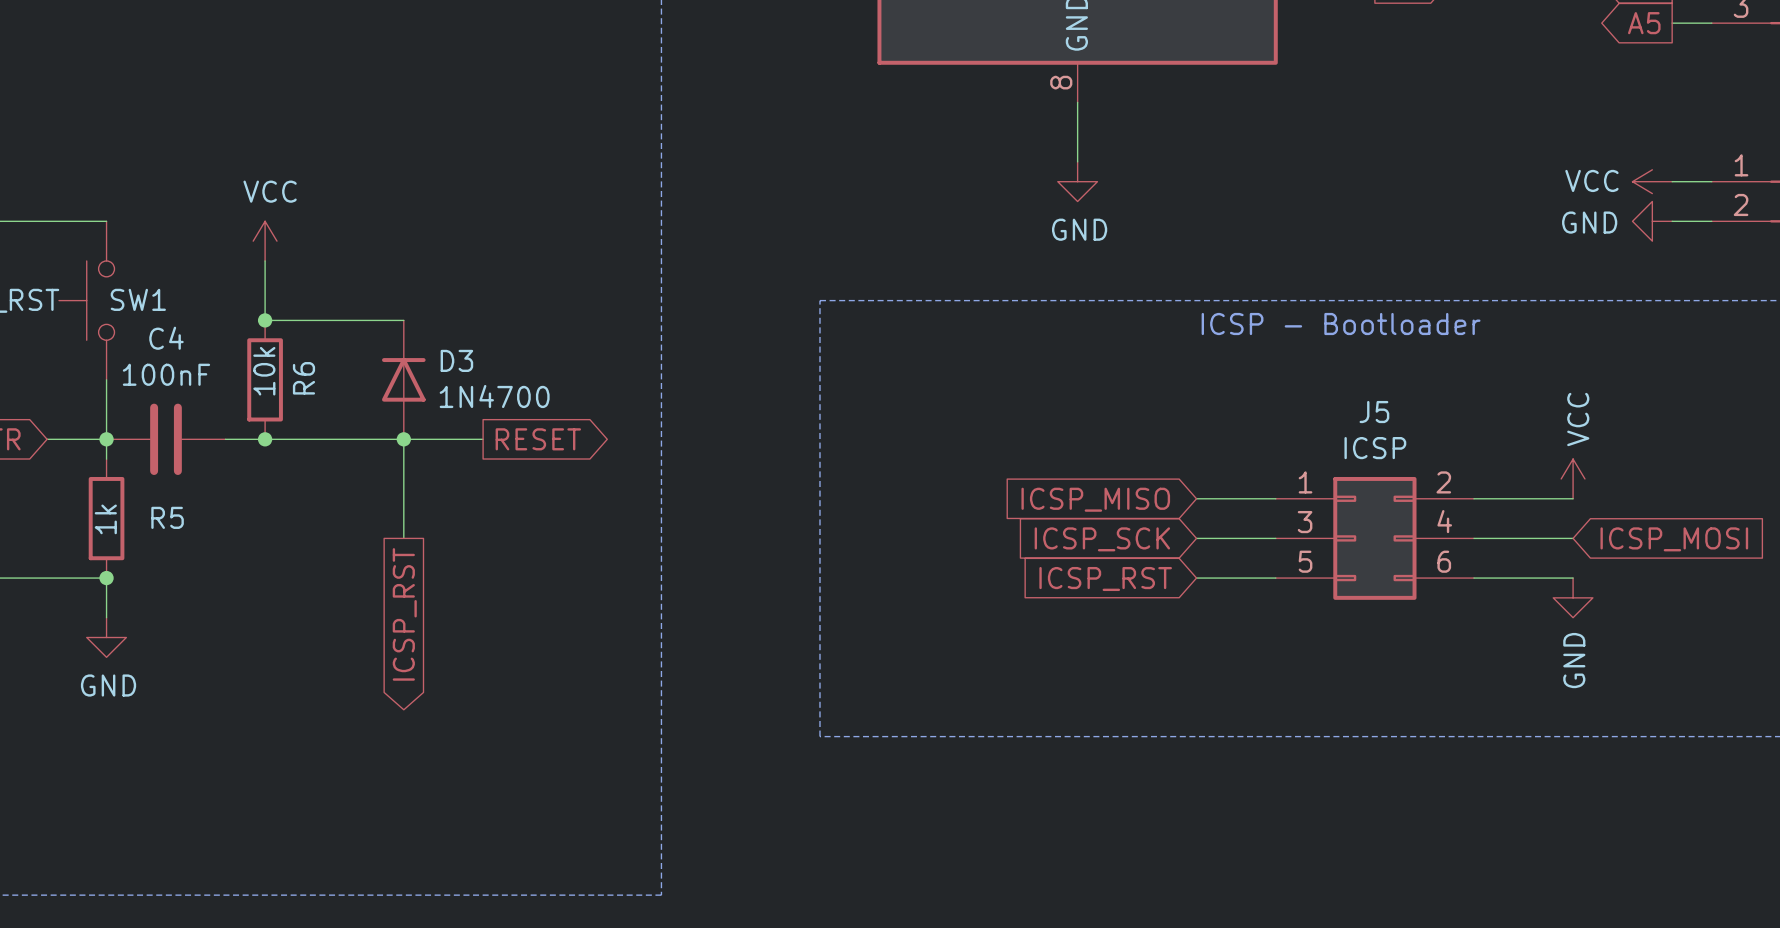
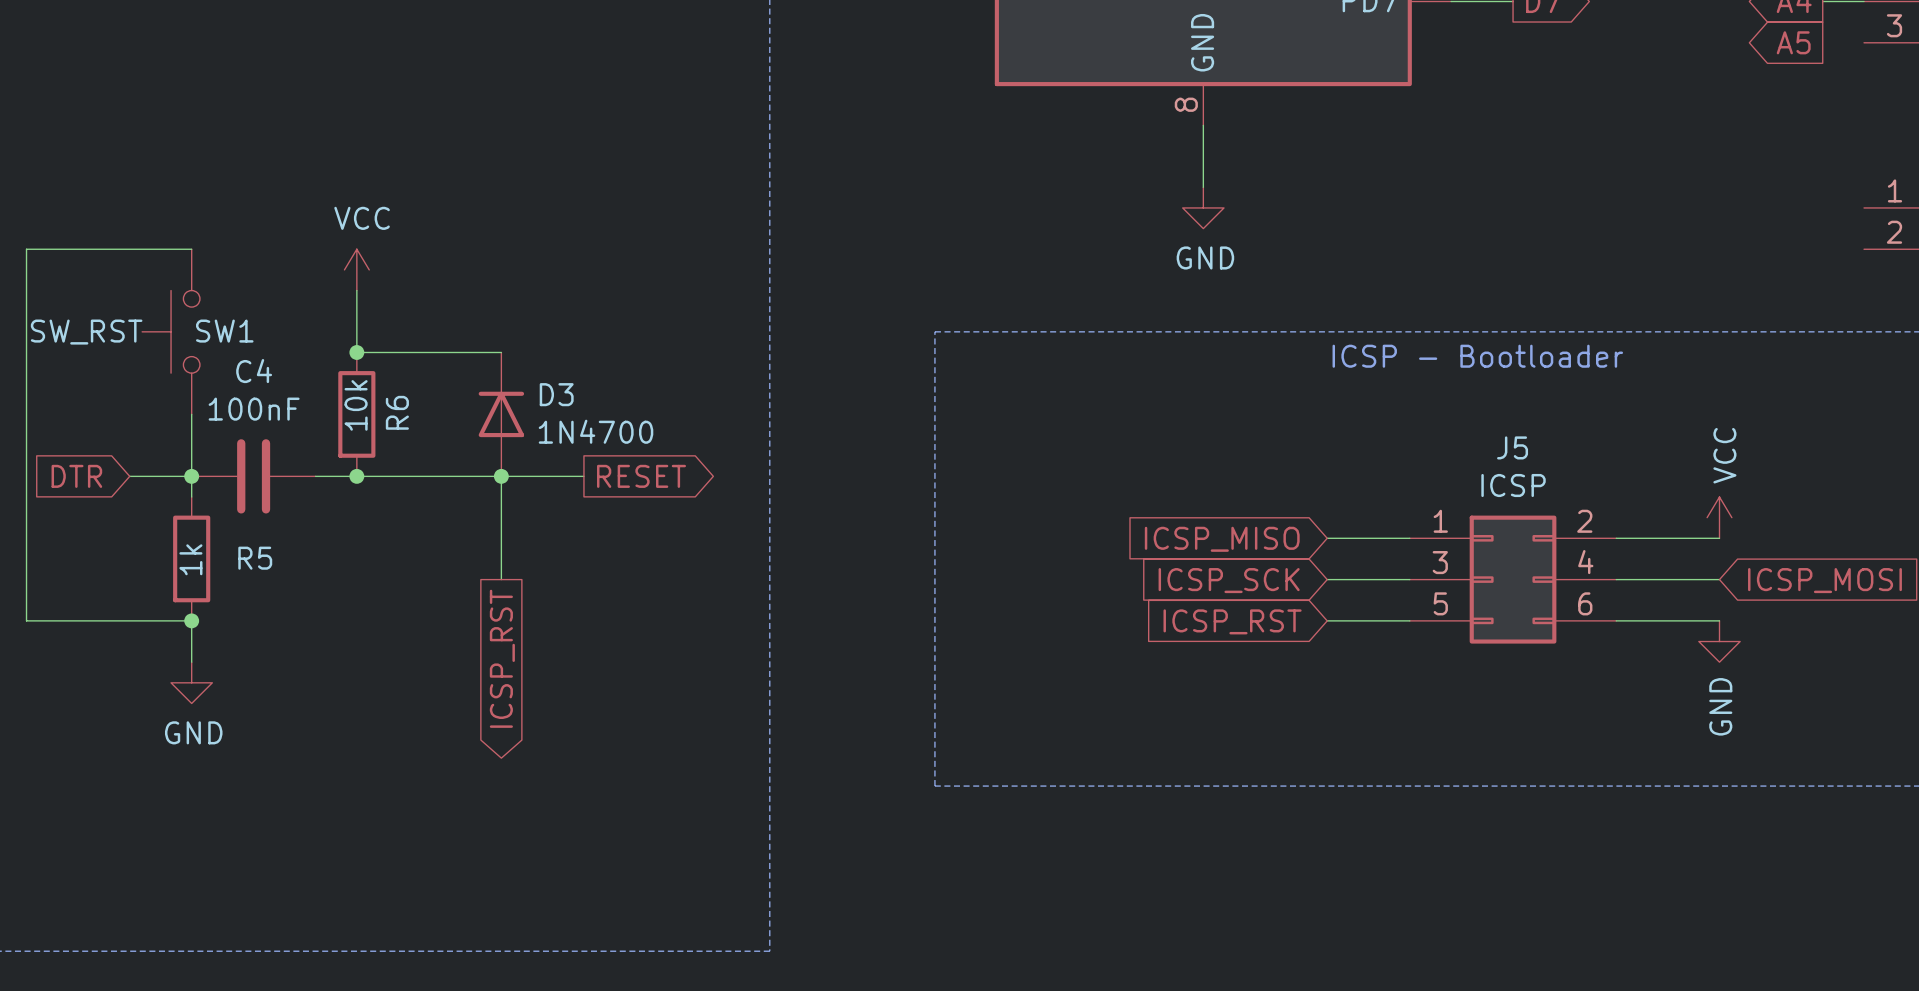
wire: (1672, 23) (1711, 23) -> none
power symbol: VCC (1652, 181) -> none
wire: (1672, 181) (1711, 181) -> none
power symbol: GND (1652, 221) -> none
wire: (1672, 221) (1711, 221) -> none

